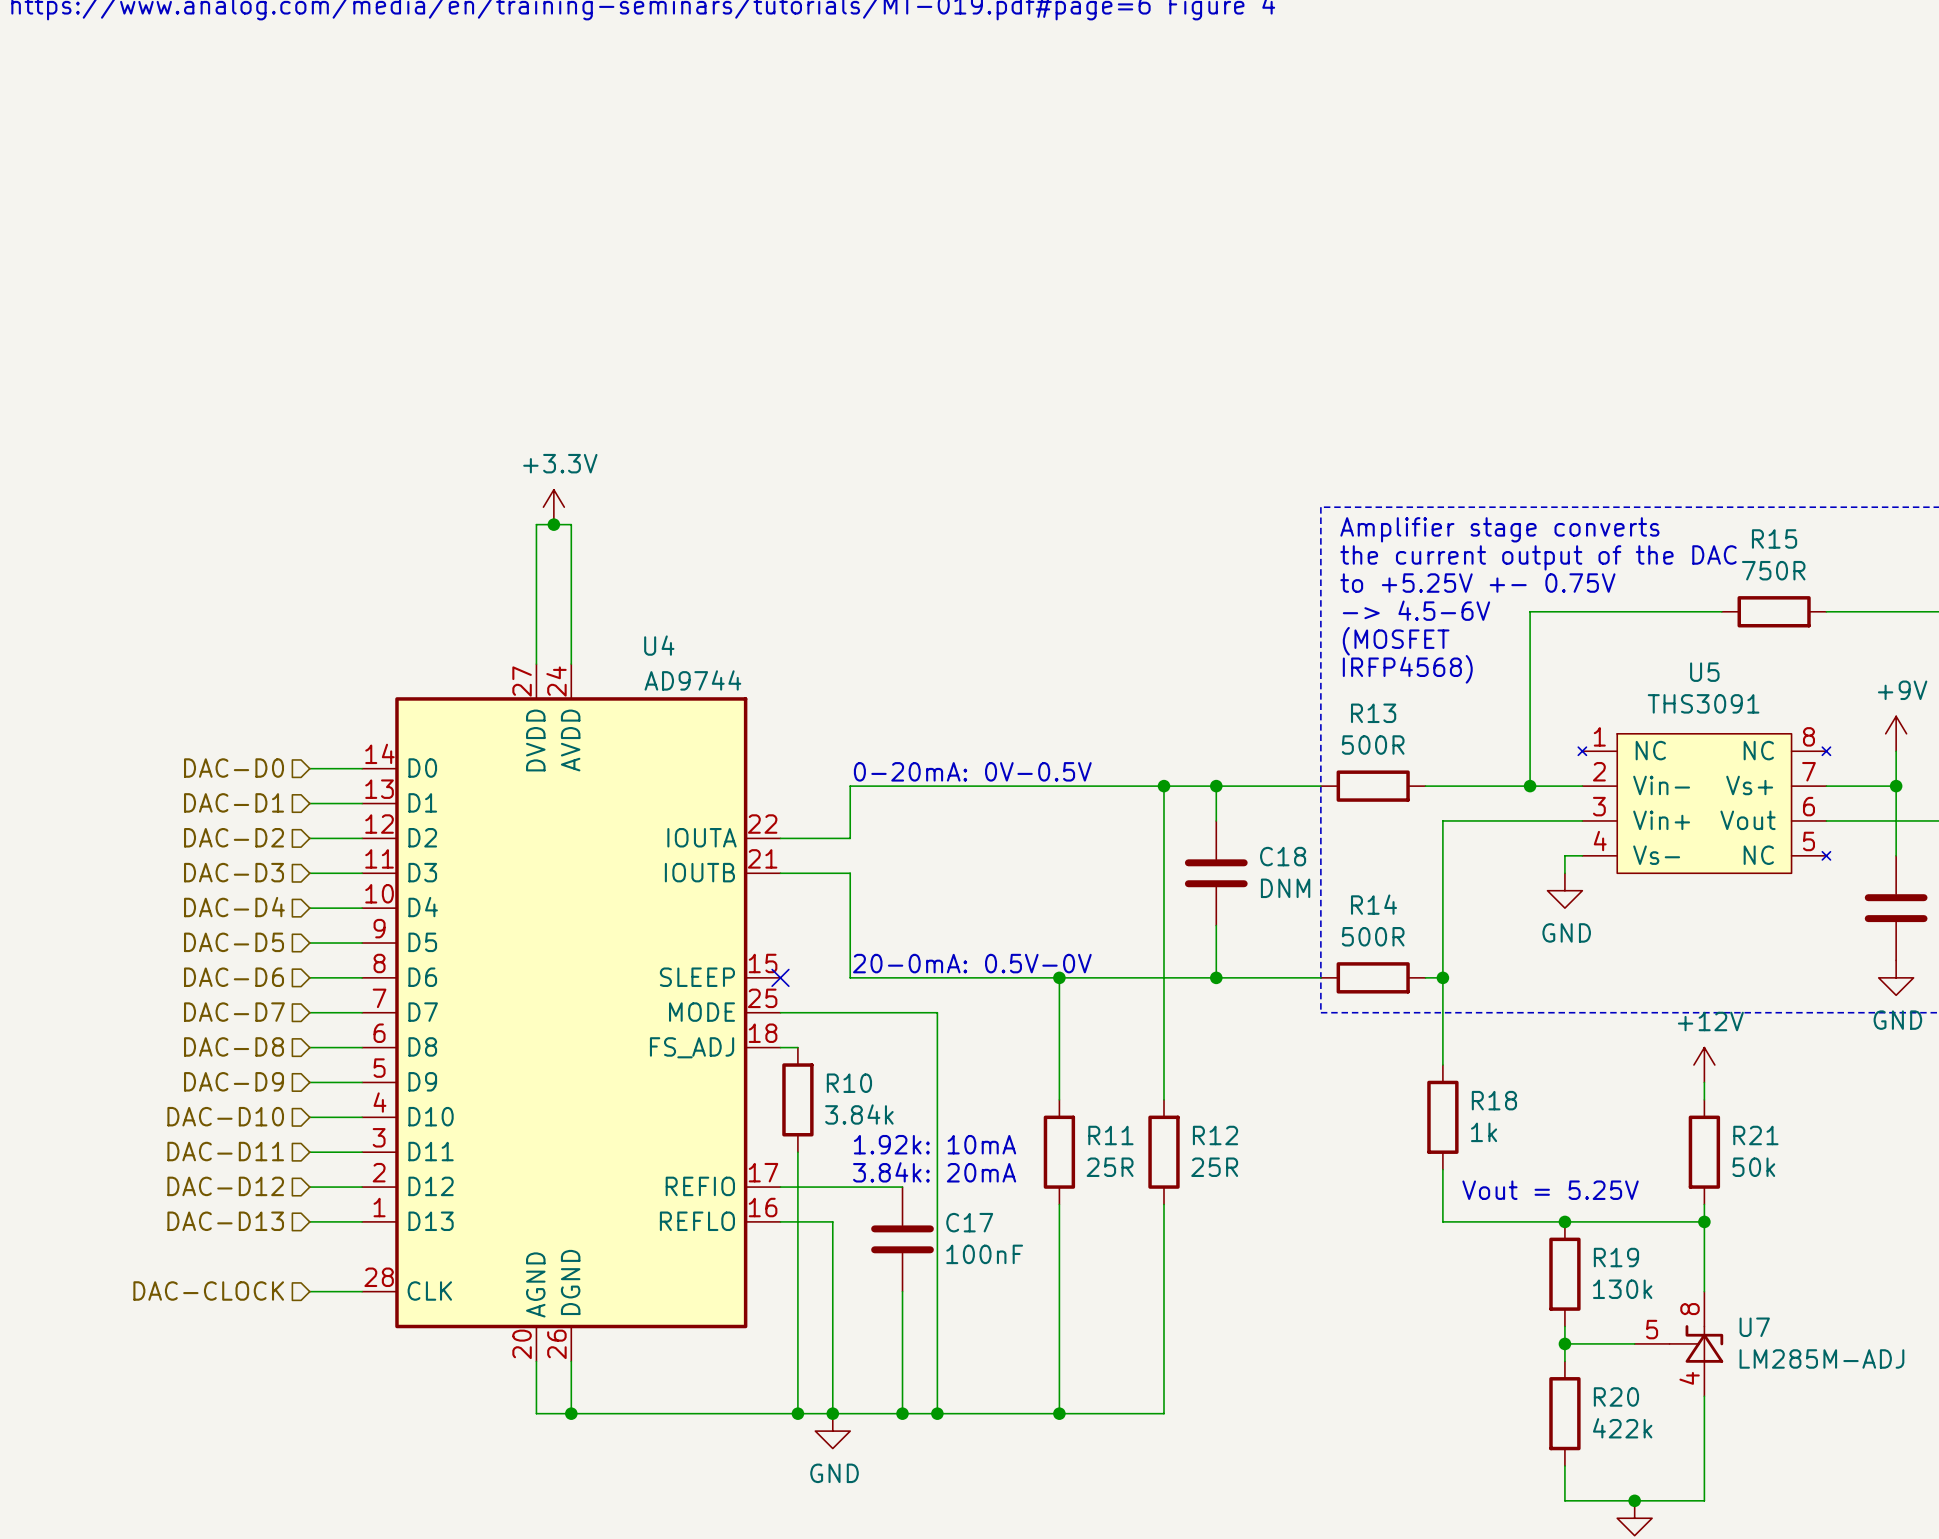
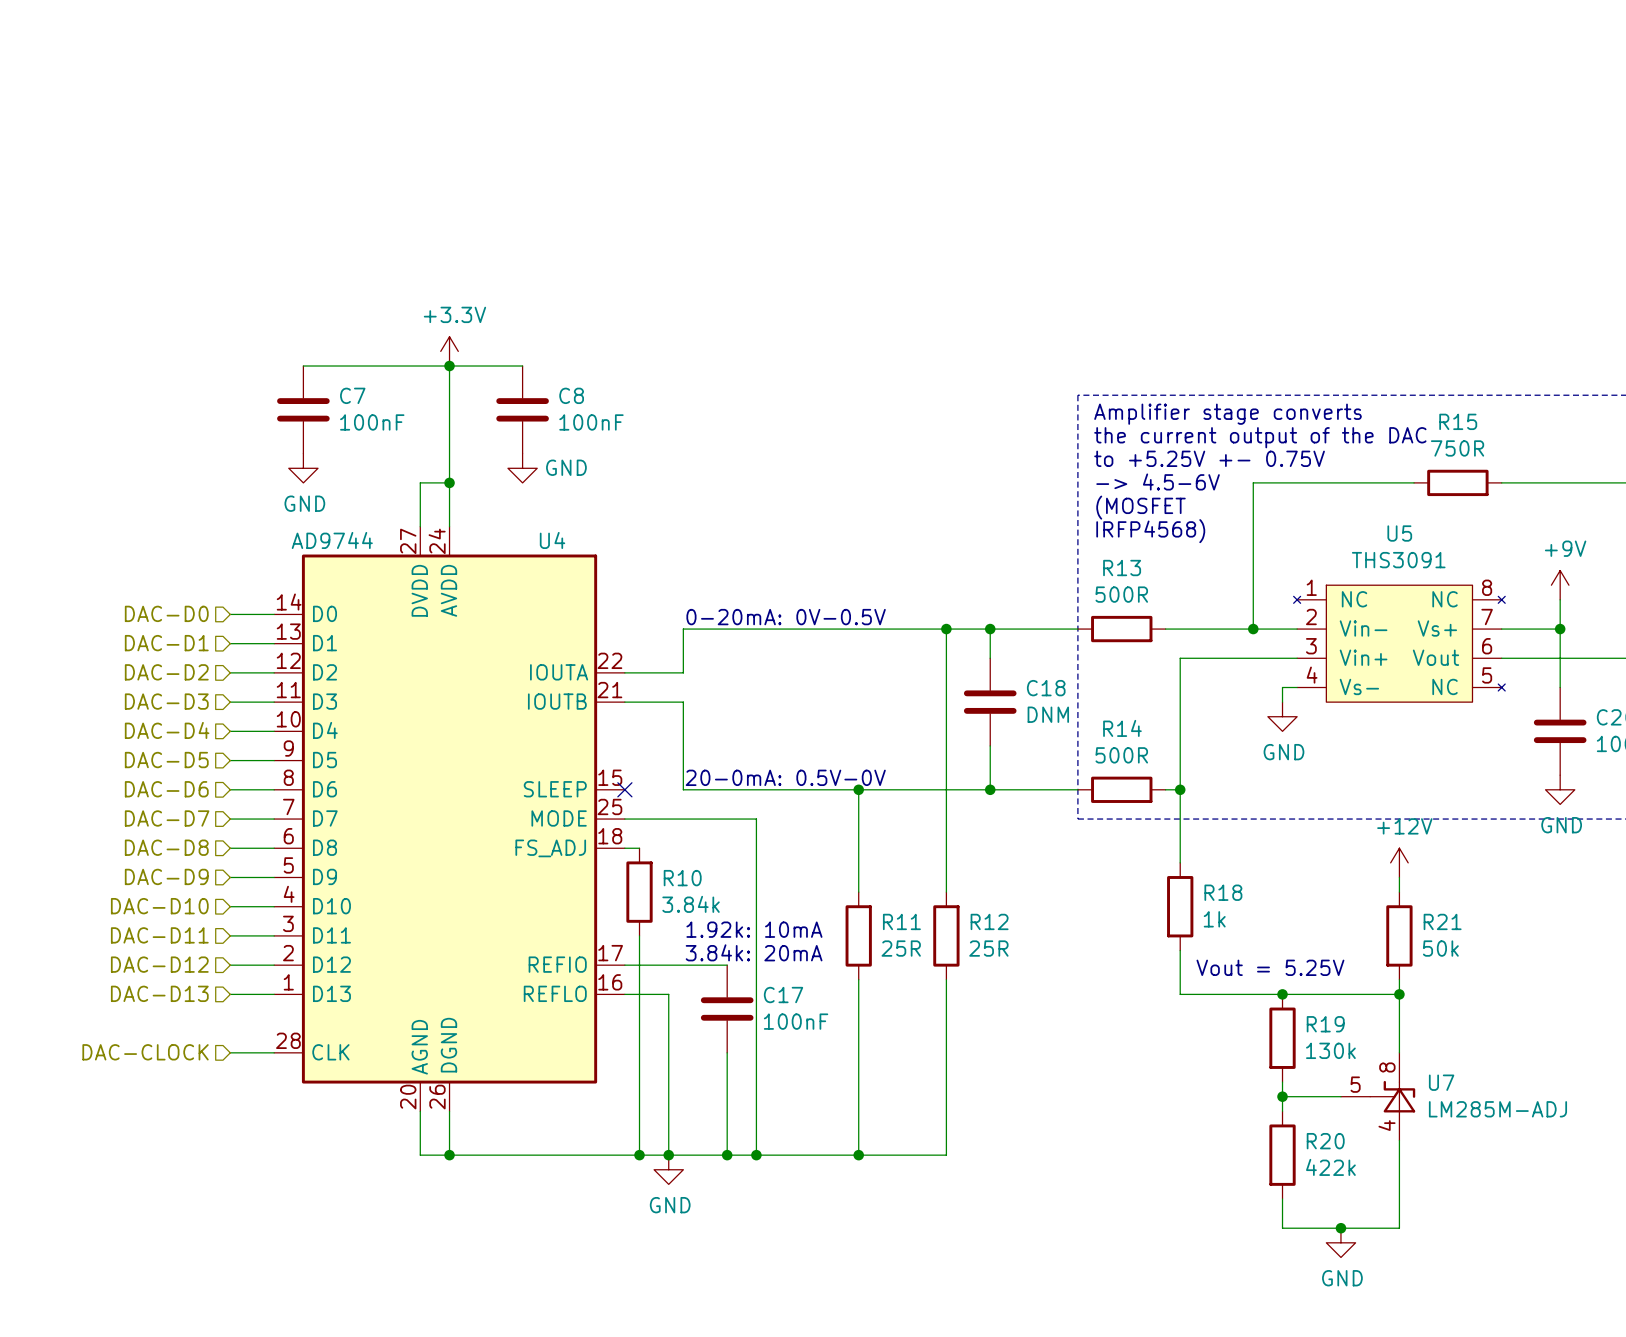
wire: none -> (303, 366) (522, 366)
wire: none -> (449, 366) (449, 409)
junction: none -> (449, 366)
power symbol position: +3.3V (553, 507) -> +3.3V (449, 351)
C7: none -> 100nF (303, 409)
junction: (553, 524) -> none
wire: (571, 524) (536, 524) (536, 611) -> (449, 482) (420, 482)
C8: none -> 100nF (522, 409)
power symbol: none -> GND (303, 468)
power symbol: none -> GND (522, 468)
junction: none -> (449, 482)
U4 name position: U4 (659, 645) -> U4 (552, 540)
U4 value position: AD9744 (692, 680) -> AD9744 (332, 540)

